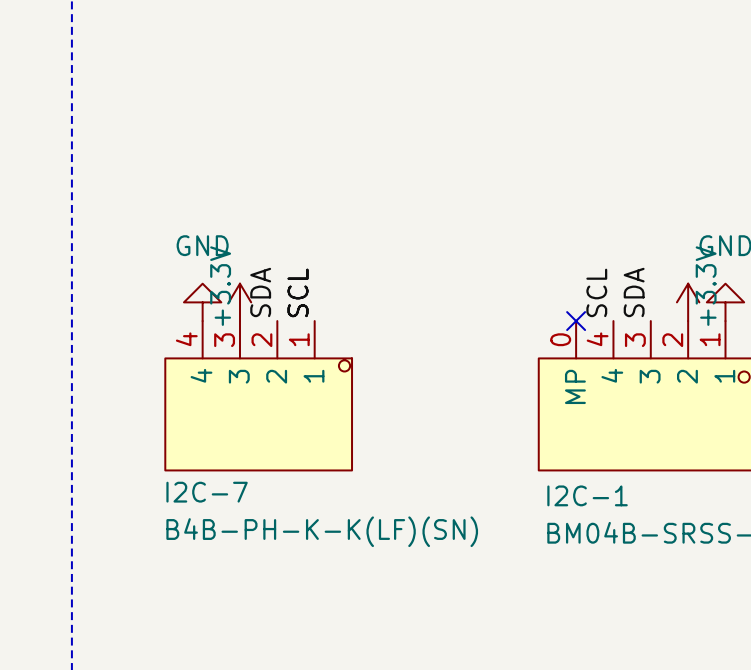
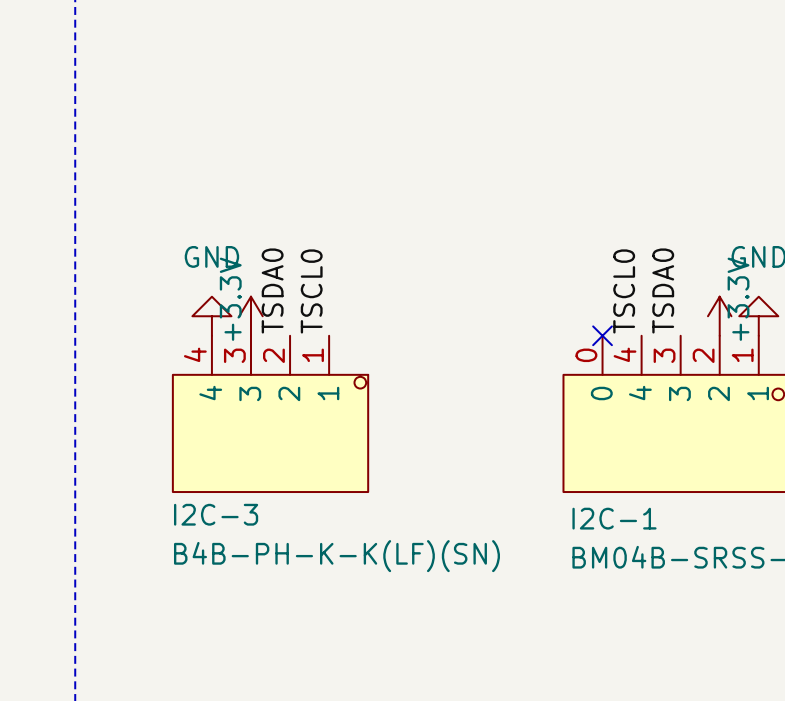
label: SDA (260, 292) -> TSDA0 (272, 291)
label: SCL (298, 292) -> TSCL0 (311, 291)
label: SCL (596, 292) -> TSCL0 (624, 291)
label: SDA (634, 292) -> TSDA0 (663, 291)
I2C-1 pin name: MP (575, 386) -> 0 (601, 393)
I2C-7 name: I2C-7 (207, 492) -> I2C-3 (216, 514)

